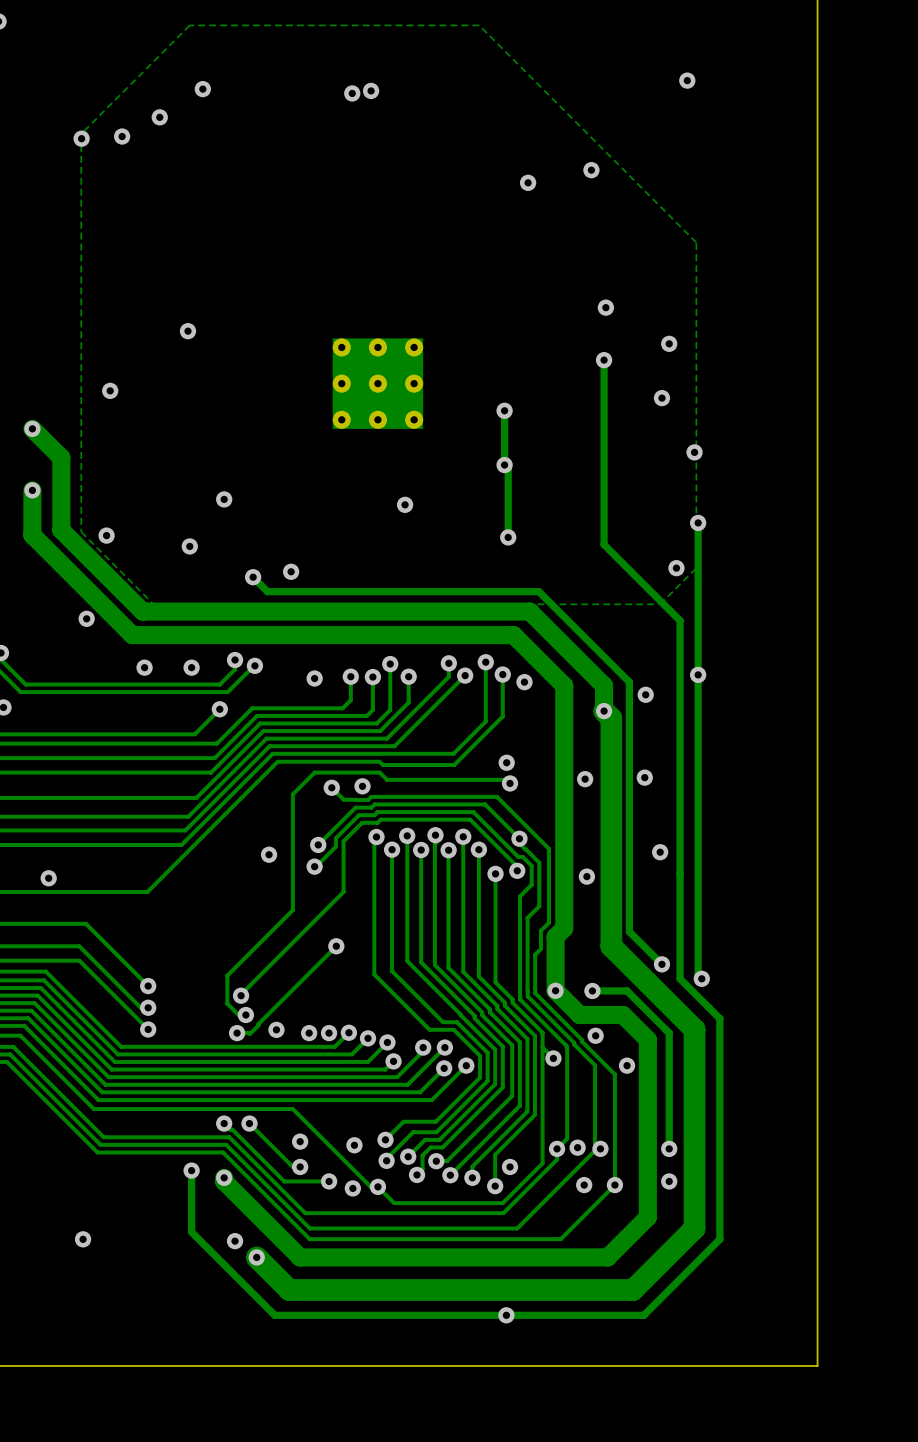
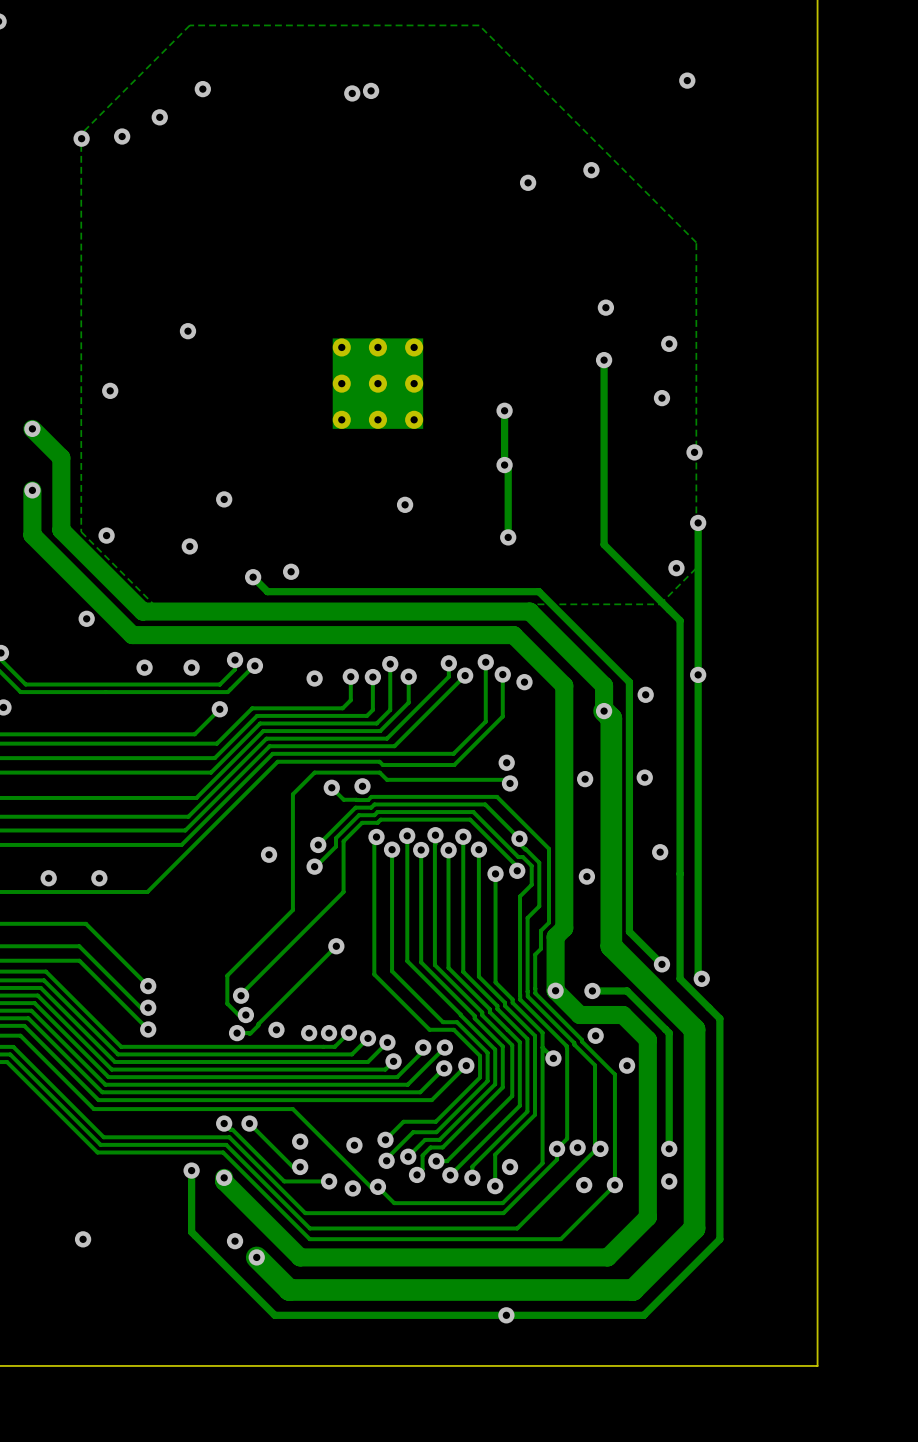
via: none -> (99, 878)

